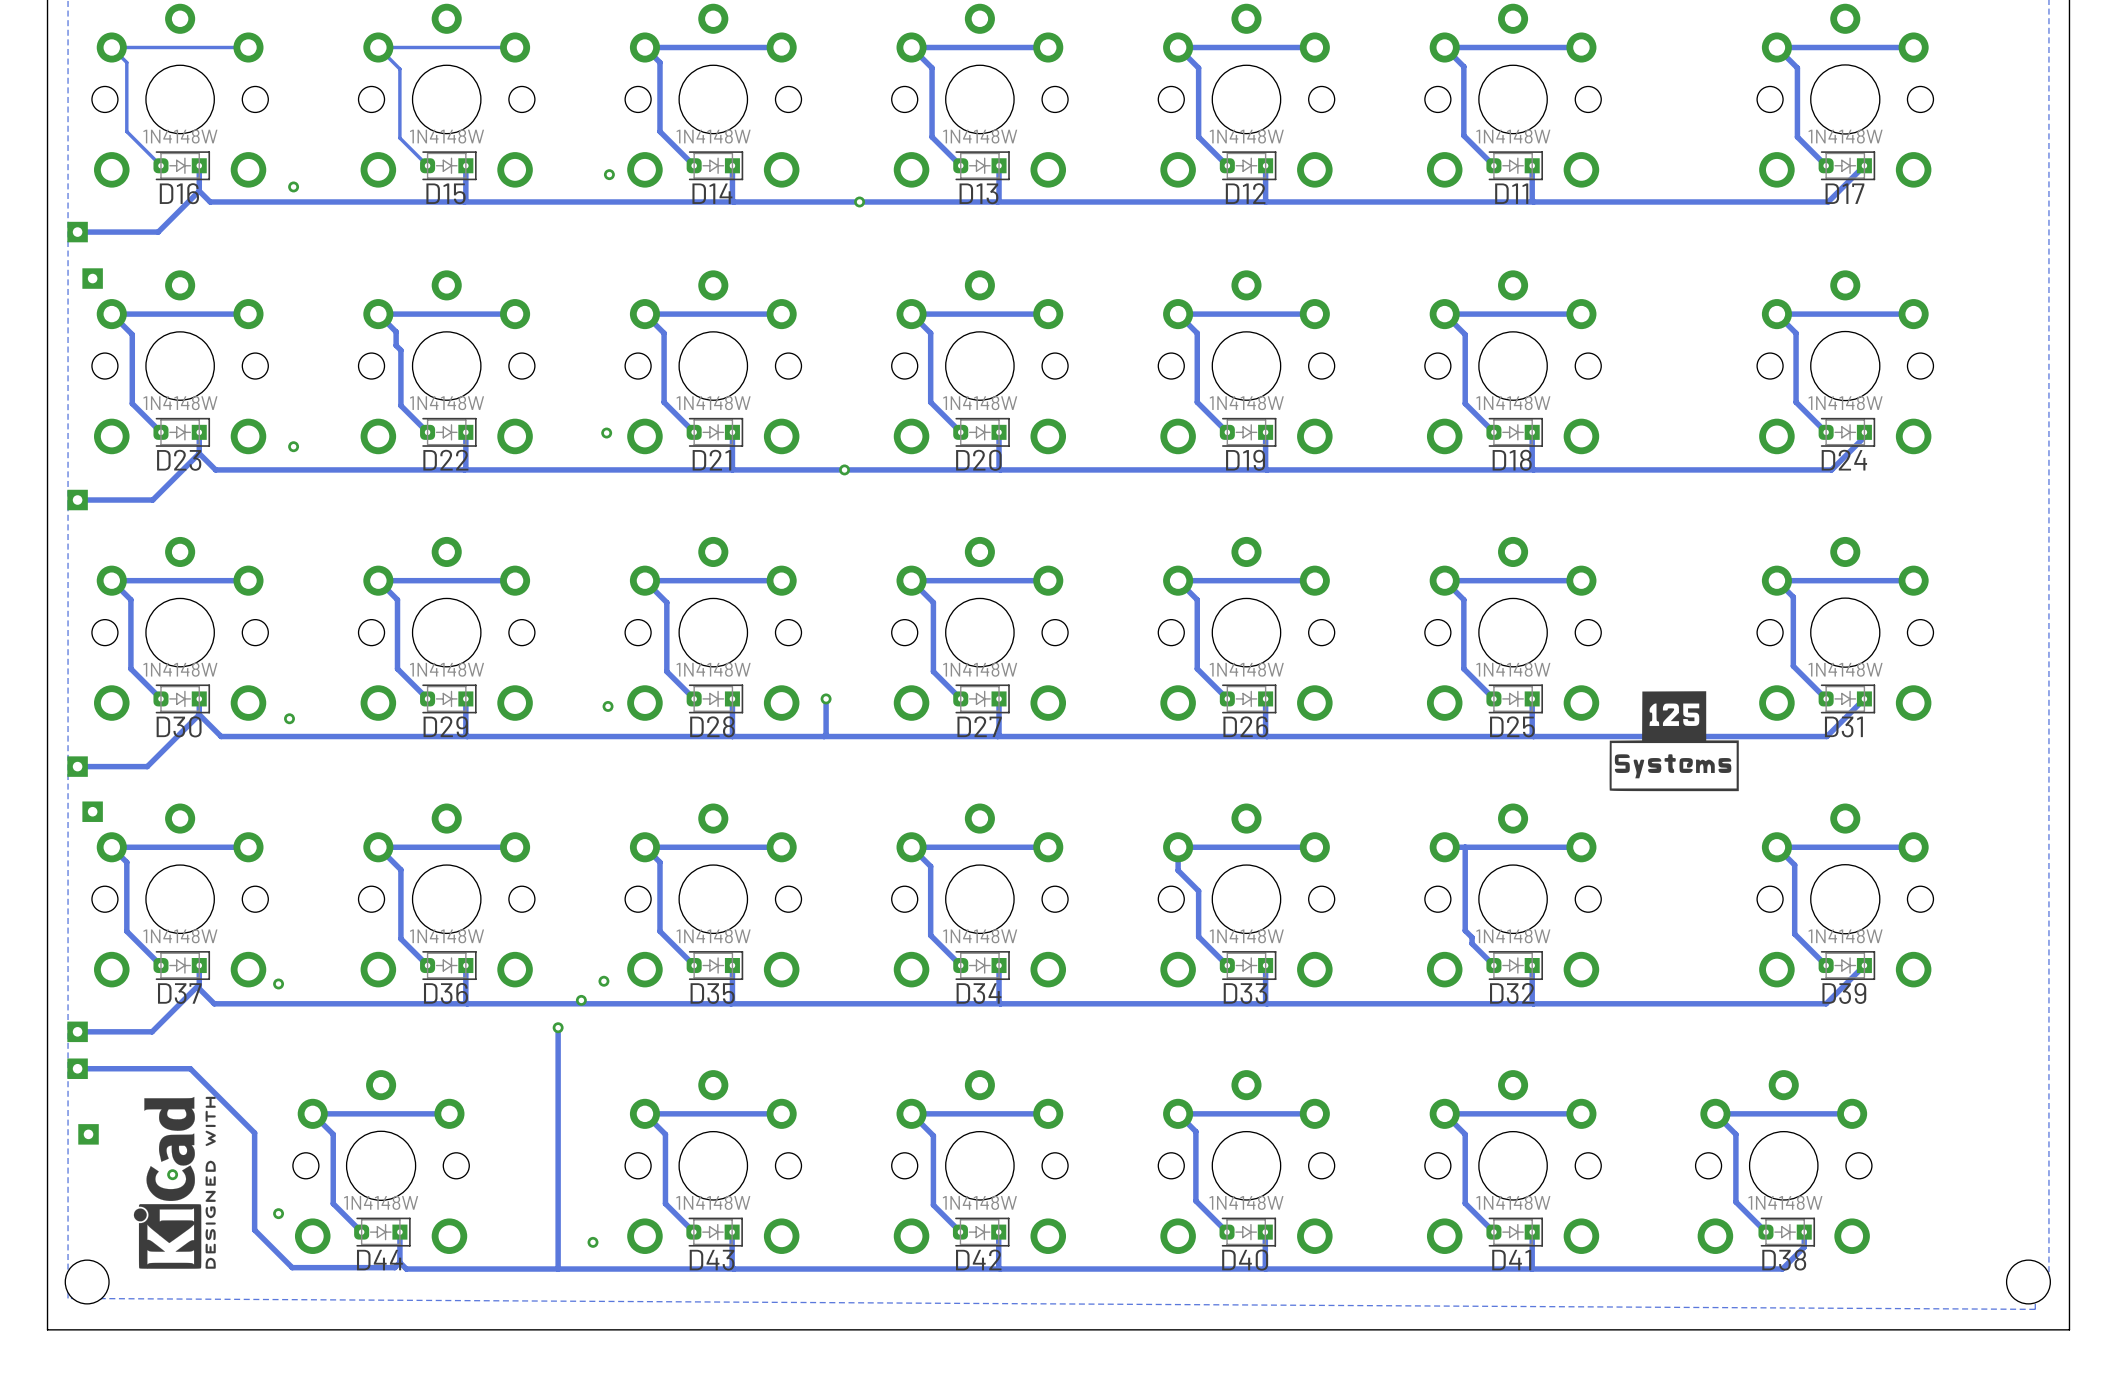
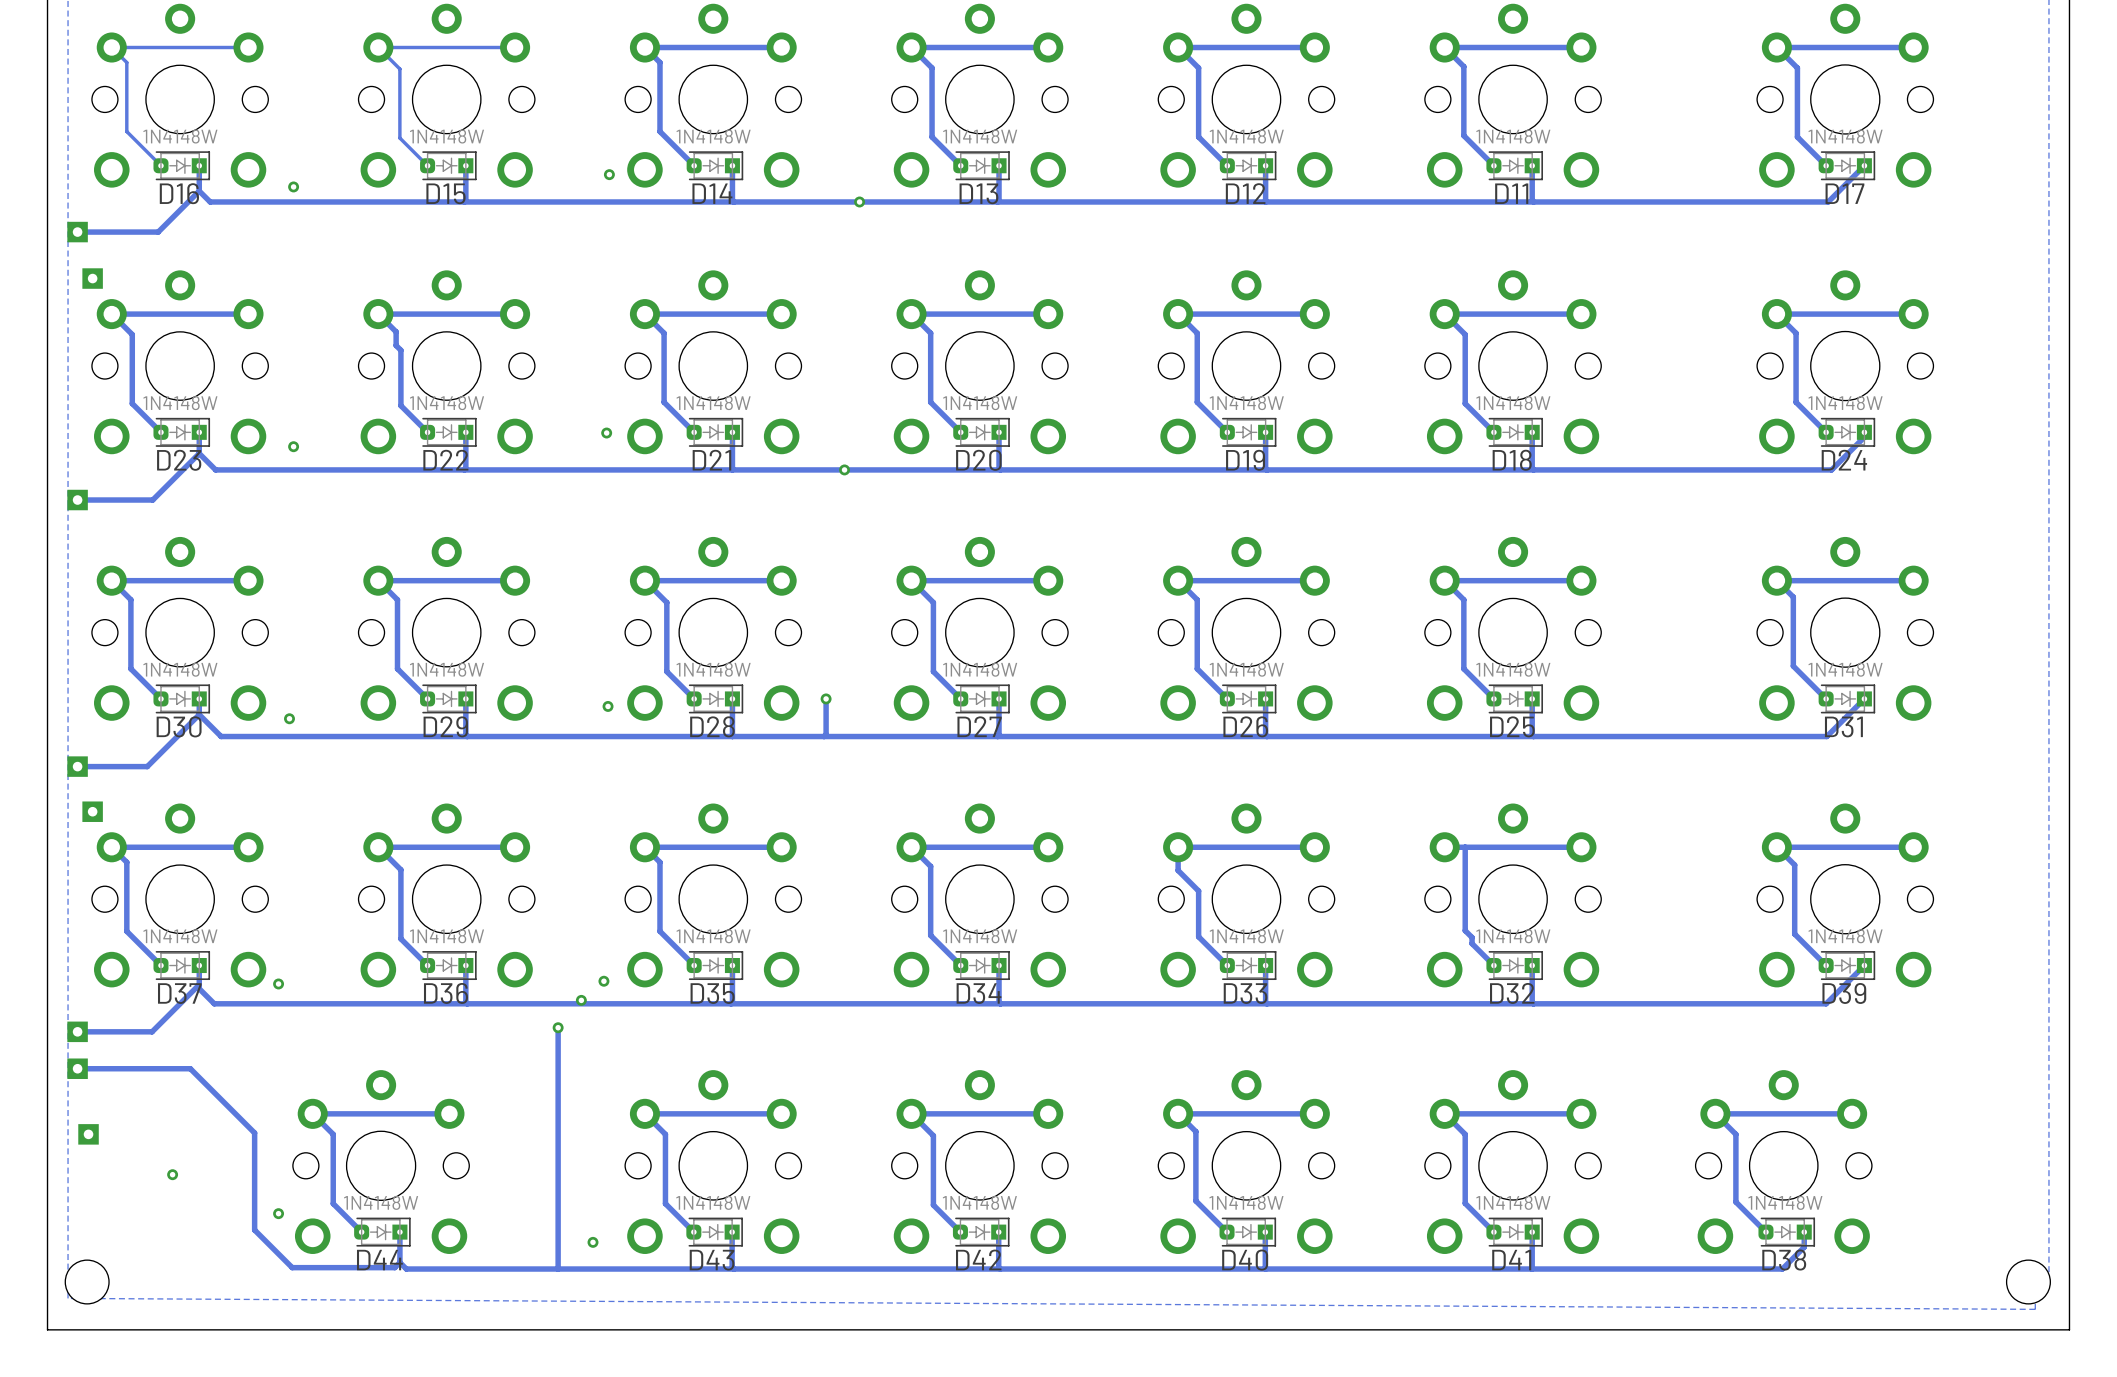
drawing: [1609, 691, 1739, 792] -> none
drawing: [133, 1096, 216, 1269] -> none

